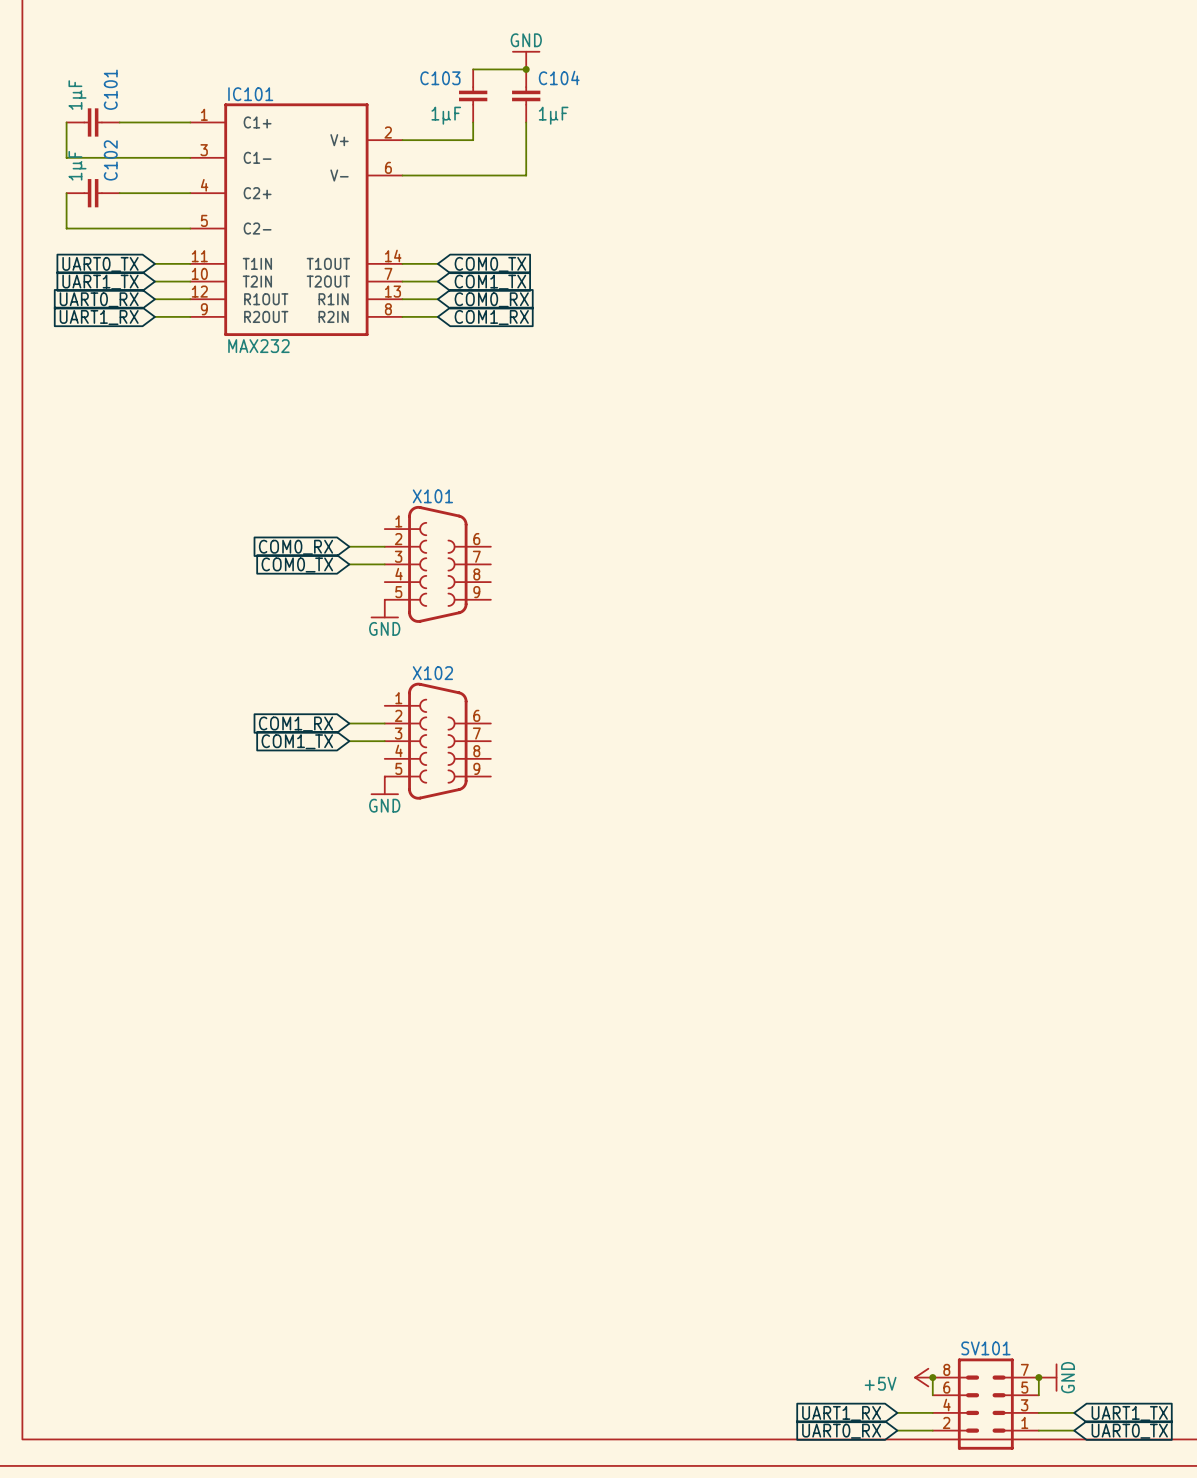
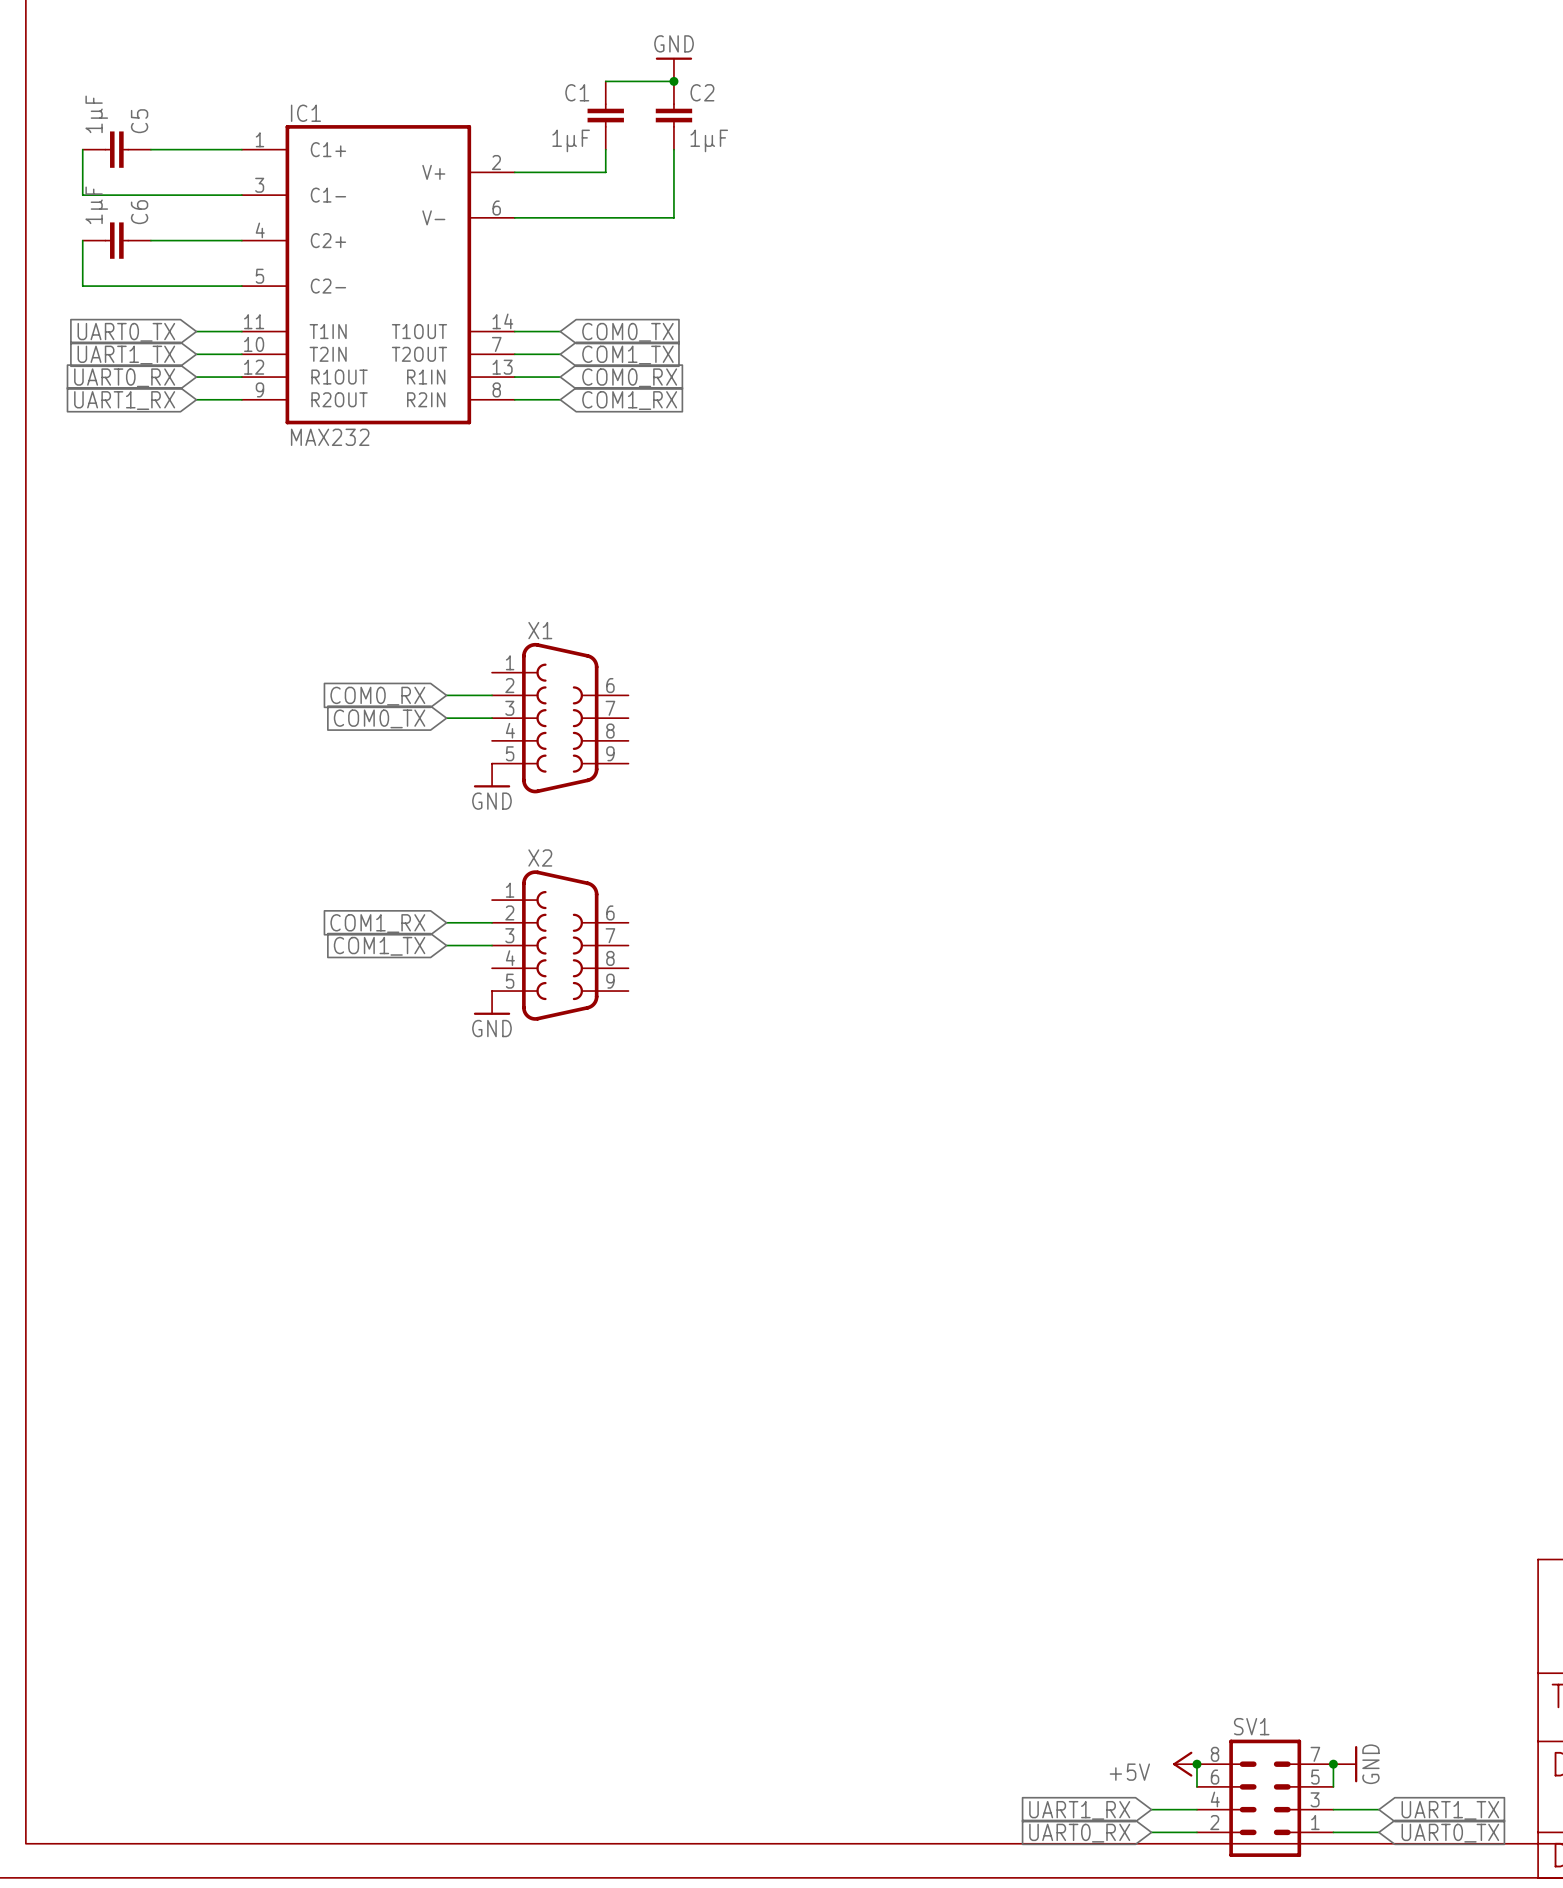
C104 name: C104 (559, 77) -> C2 (702, 92)
C103 name: C103 (440, 78) -> C1 (577, 92)
C101 name: C101 (110, 89) -> C5 (139, 121)
IC101 name: IC101 (250, 94) -> IC1 (305, 113)
C102 name: C102 (110, 160) -> C6 (139, 212)
X101 name: X101 (432, 496) -> X1 (540, 630)
X102 name: X102 (432, 673) -> X2 (540, 857)
SV101 name: SV101 (985, 1348) -> SV1 (1251, 1726)

